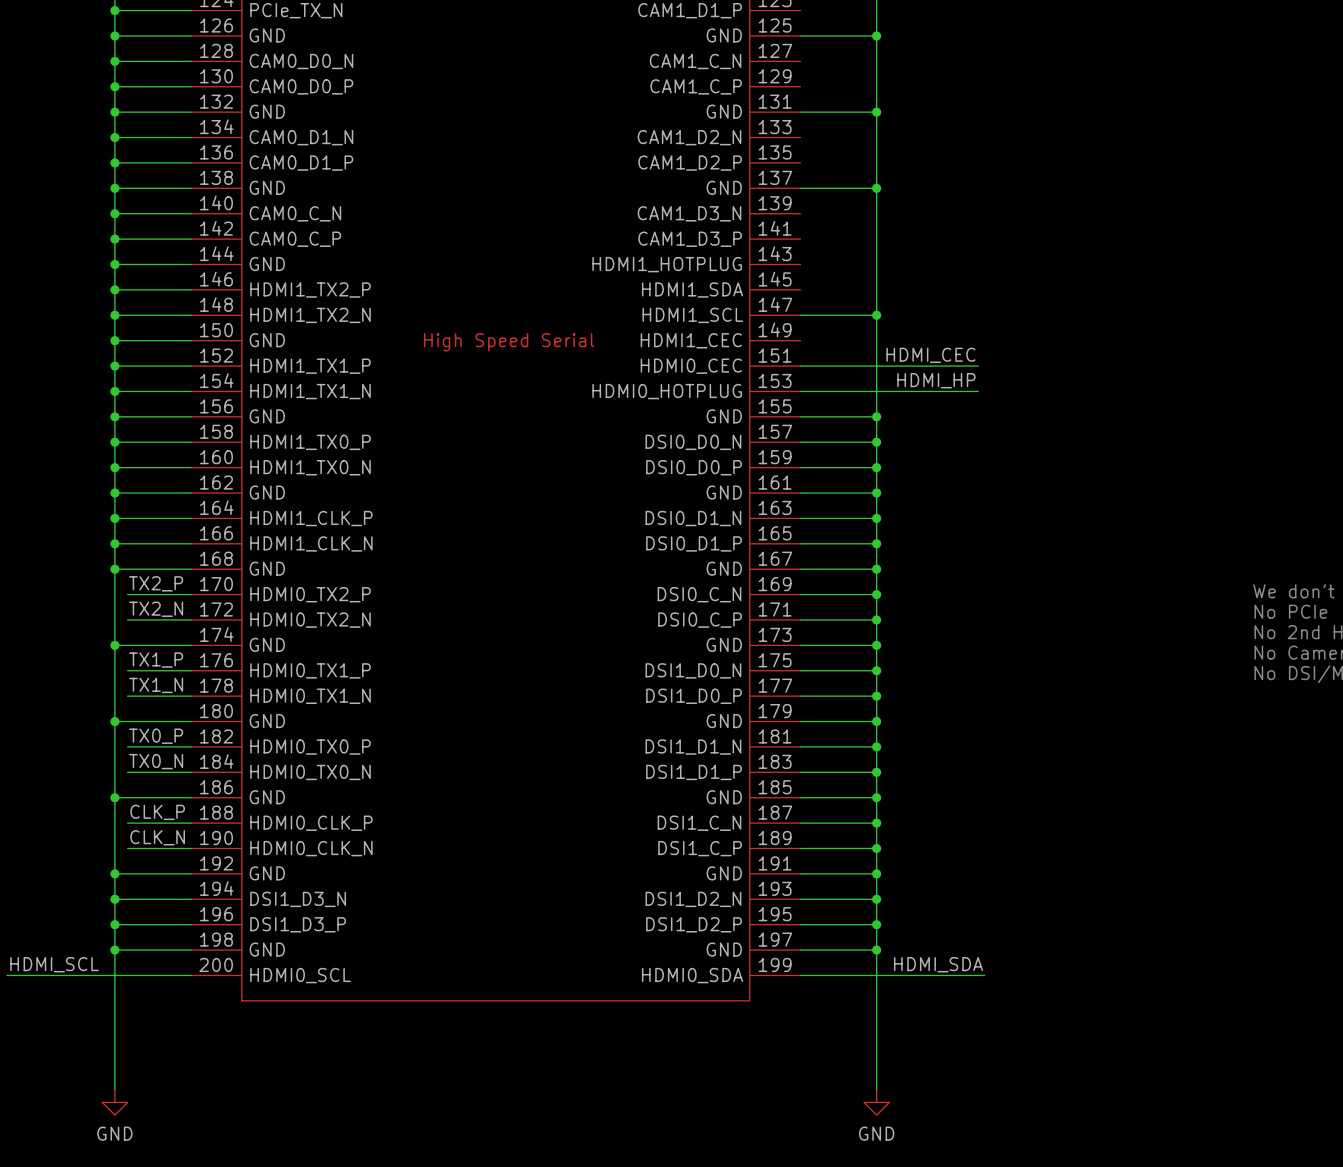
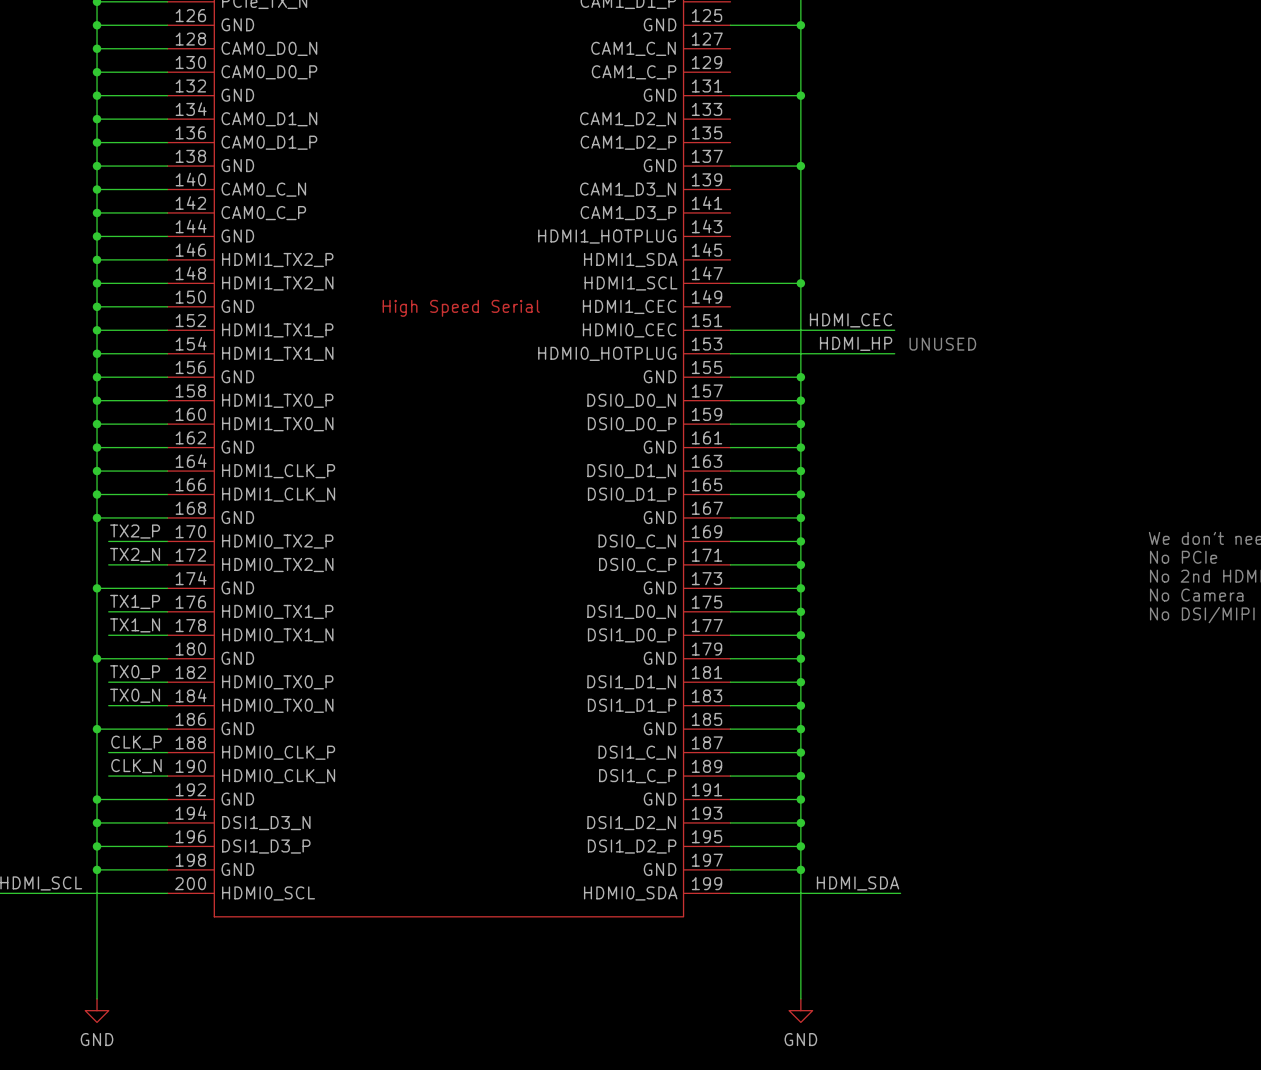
text: none -> UNUSED (942, 344)

